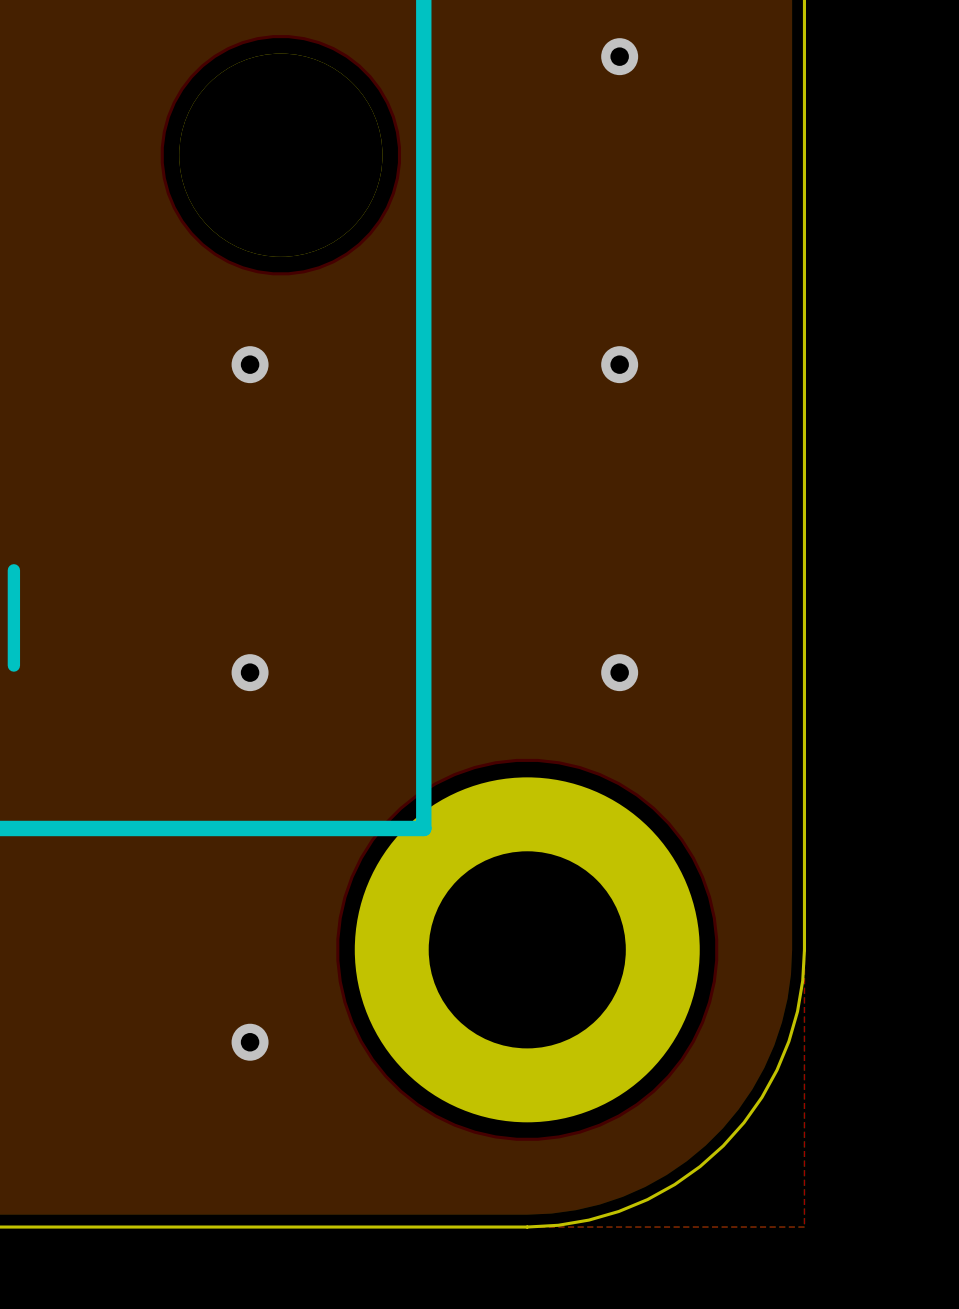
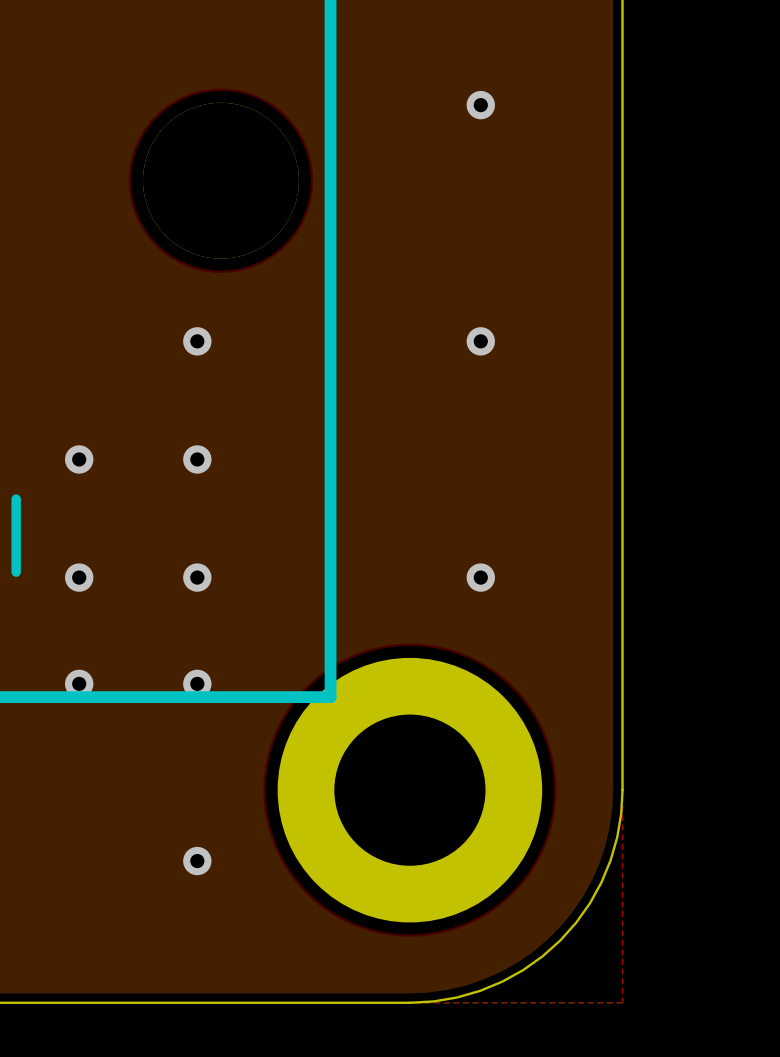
via: none -> (79, 459)
via: none -> (197, 459)
via: none -> (79, 577)
via: none -> (79, 683)
via: none -> (197, 683)

